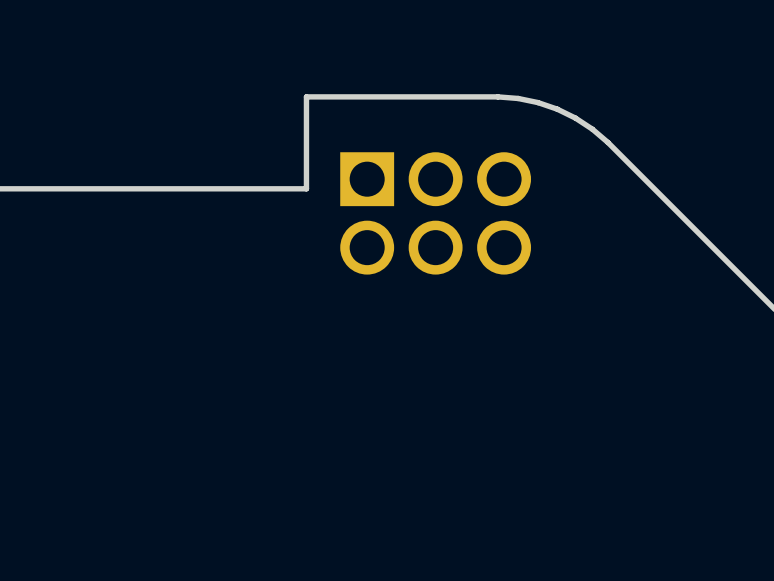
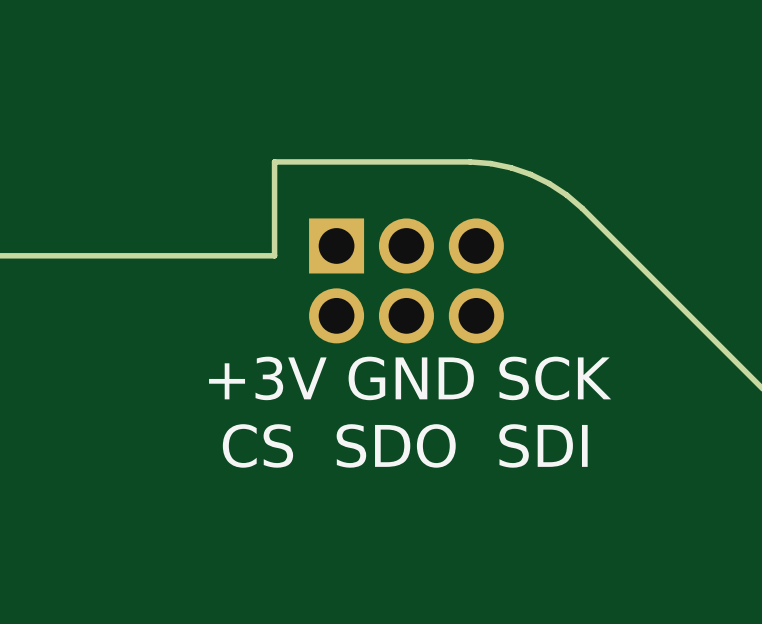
text: none -> +3V GND SCK (410, 378)
text: none -> CS SDO SDI (405, 445)

